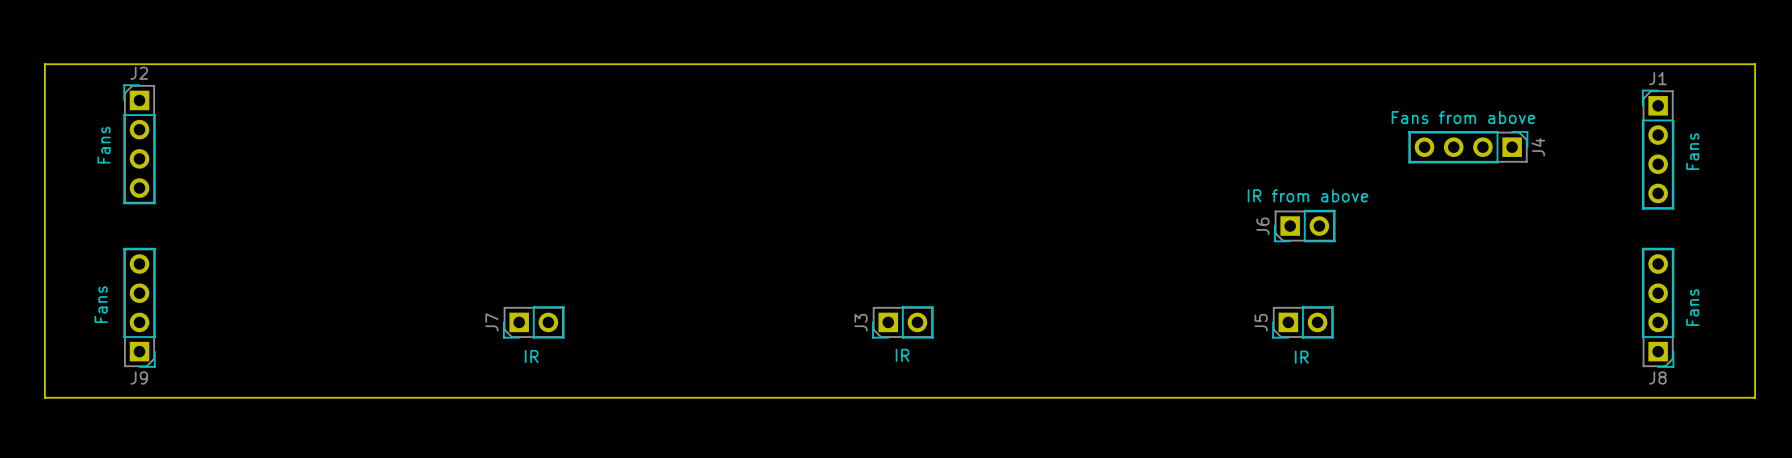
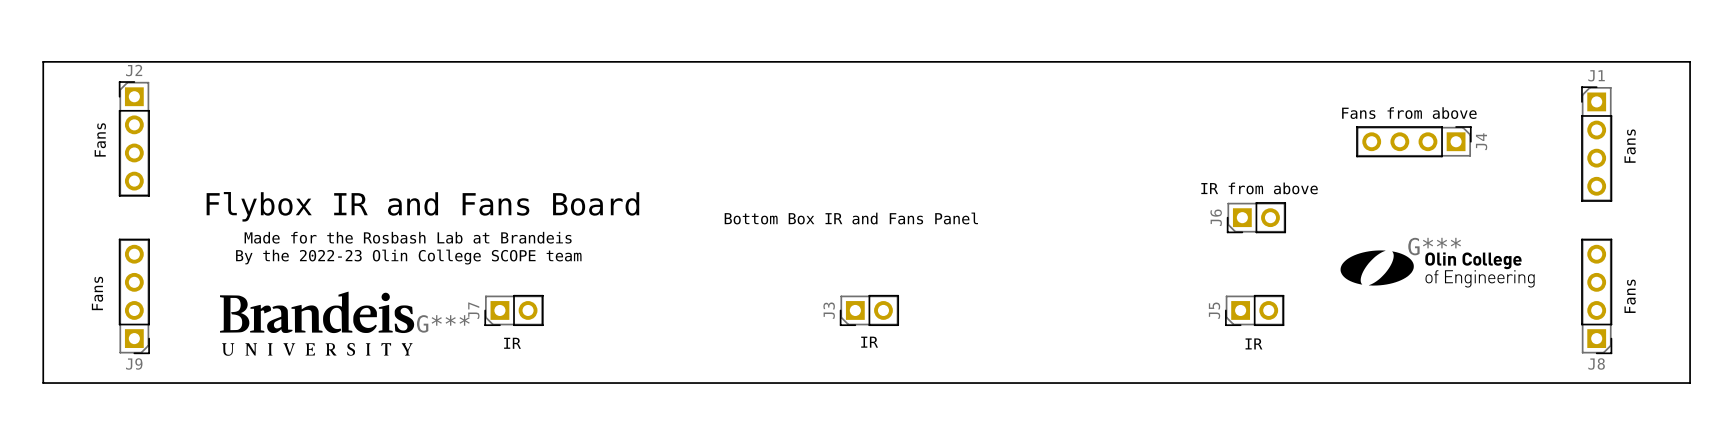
text: none -> Flybox IR and Fans Board (422, 206)
text: none -> Bottom Box IR and Fans Panel (851, 218)
text: none -> Made for the Rosbash Lab at Brandeis (408, 237)
text: none -> By the 2022-23 Olin College SCOPE team (408, 257)
G***: none -> (1437, 268)
G***: none -> (317, 323)

